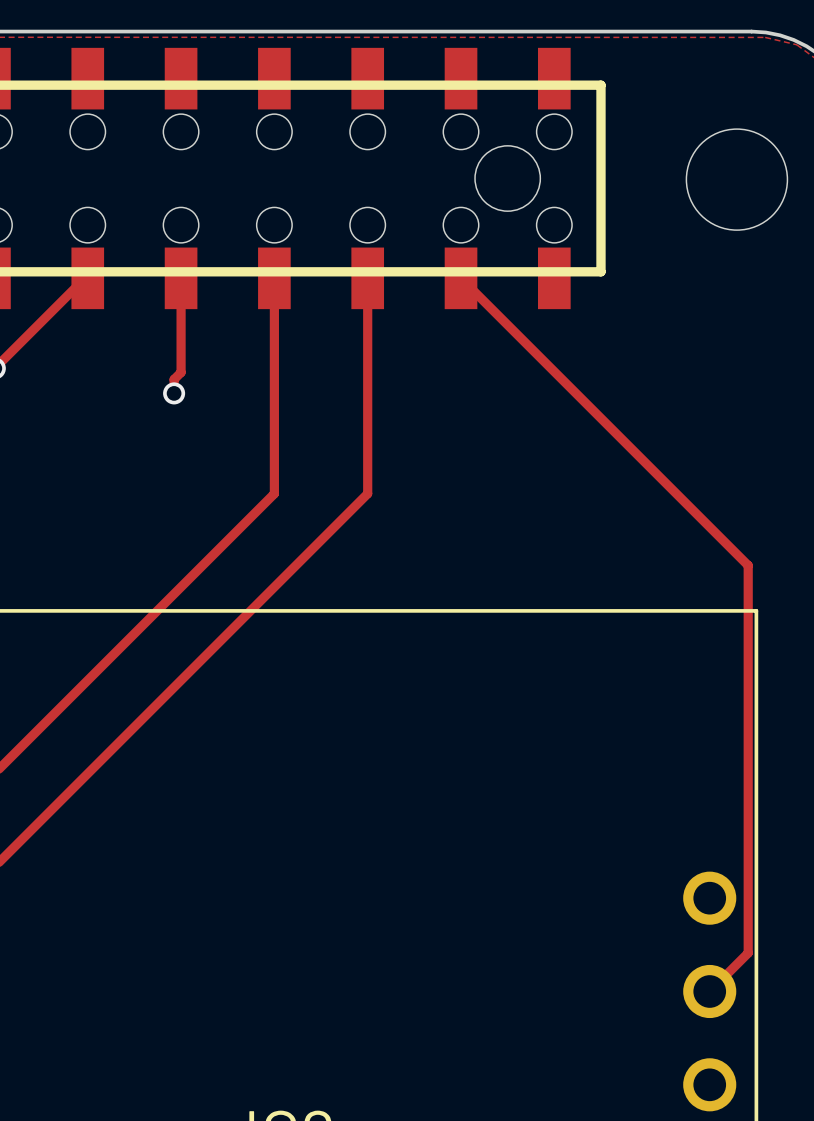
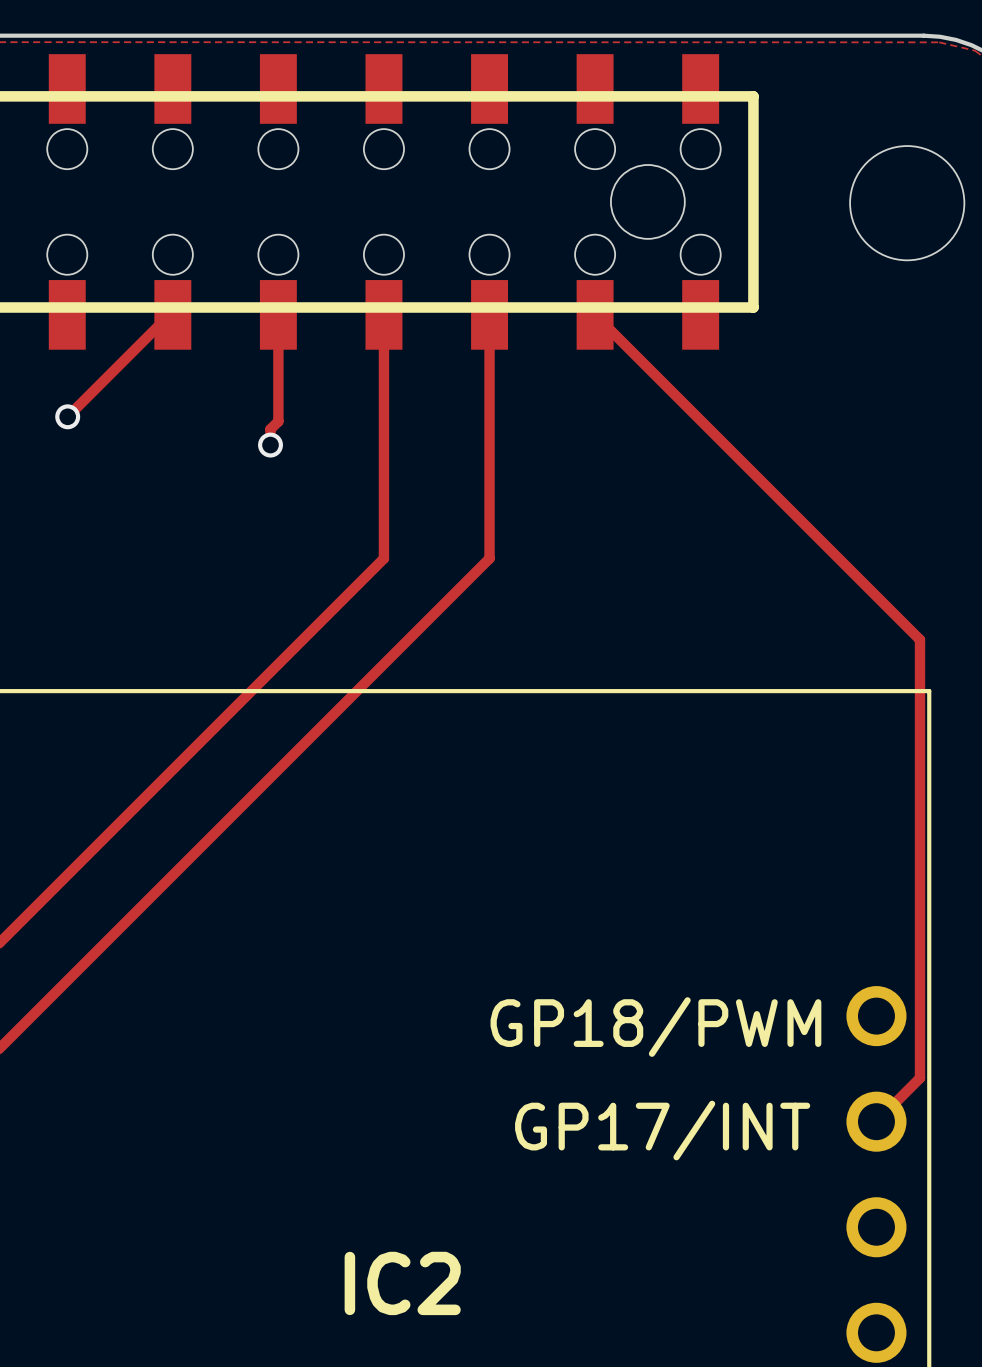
text: none -> GP18/PWM (655, 1027)
text: none -> GP17/INT (662, 1130)

